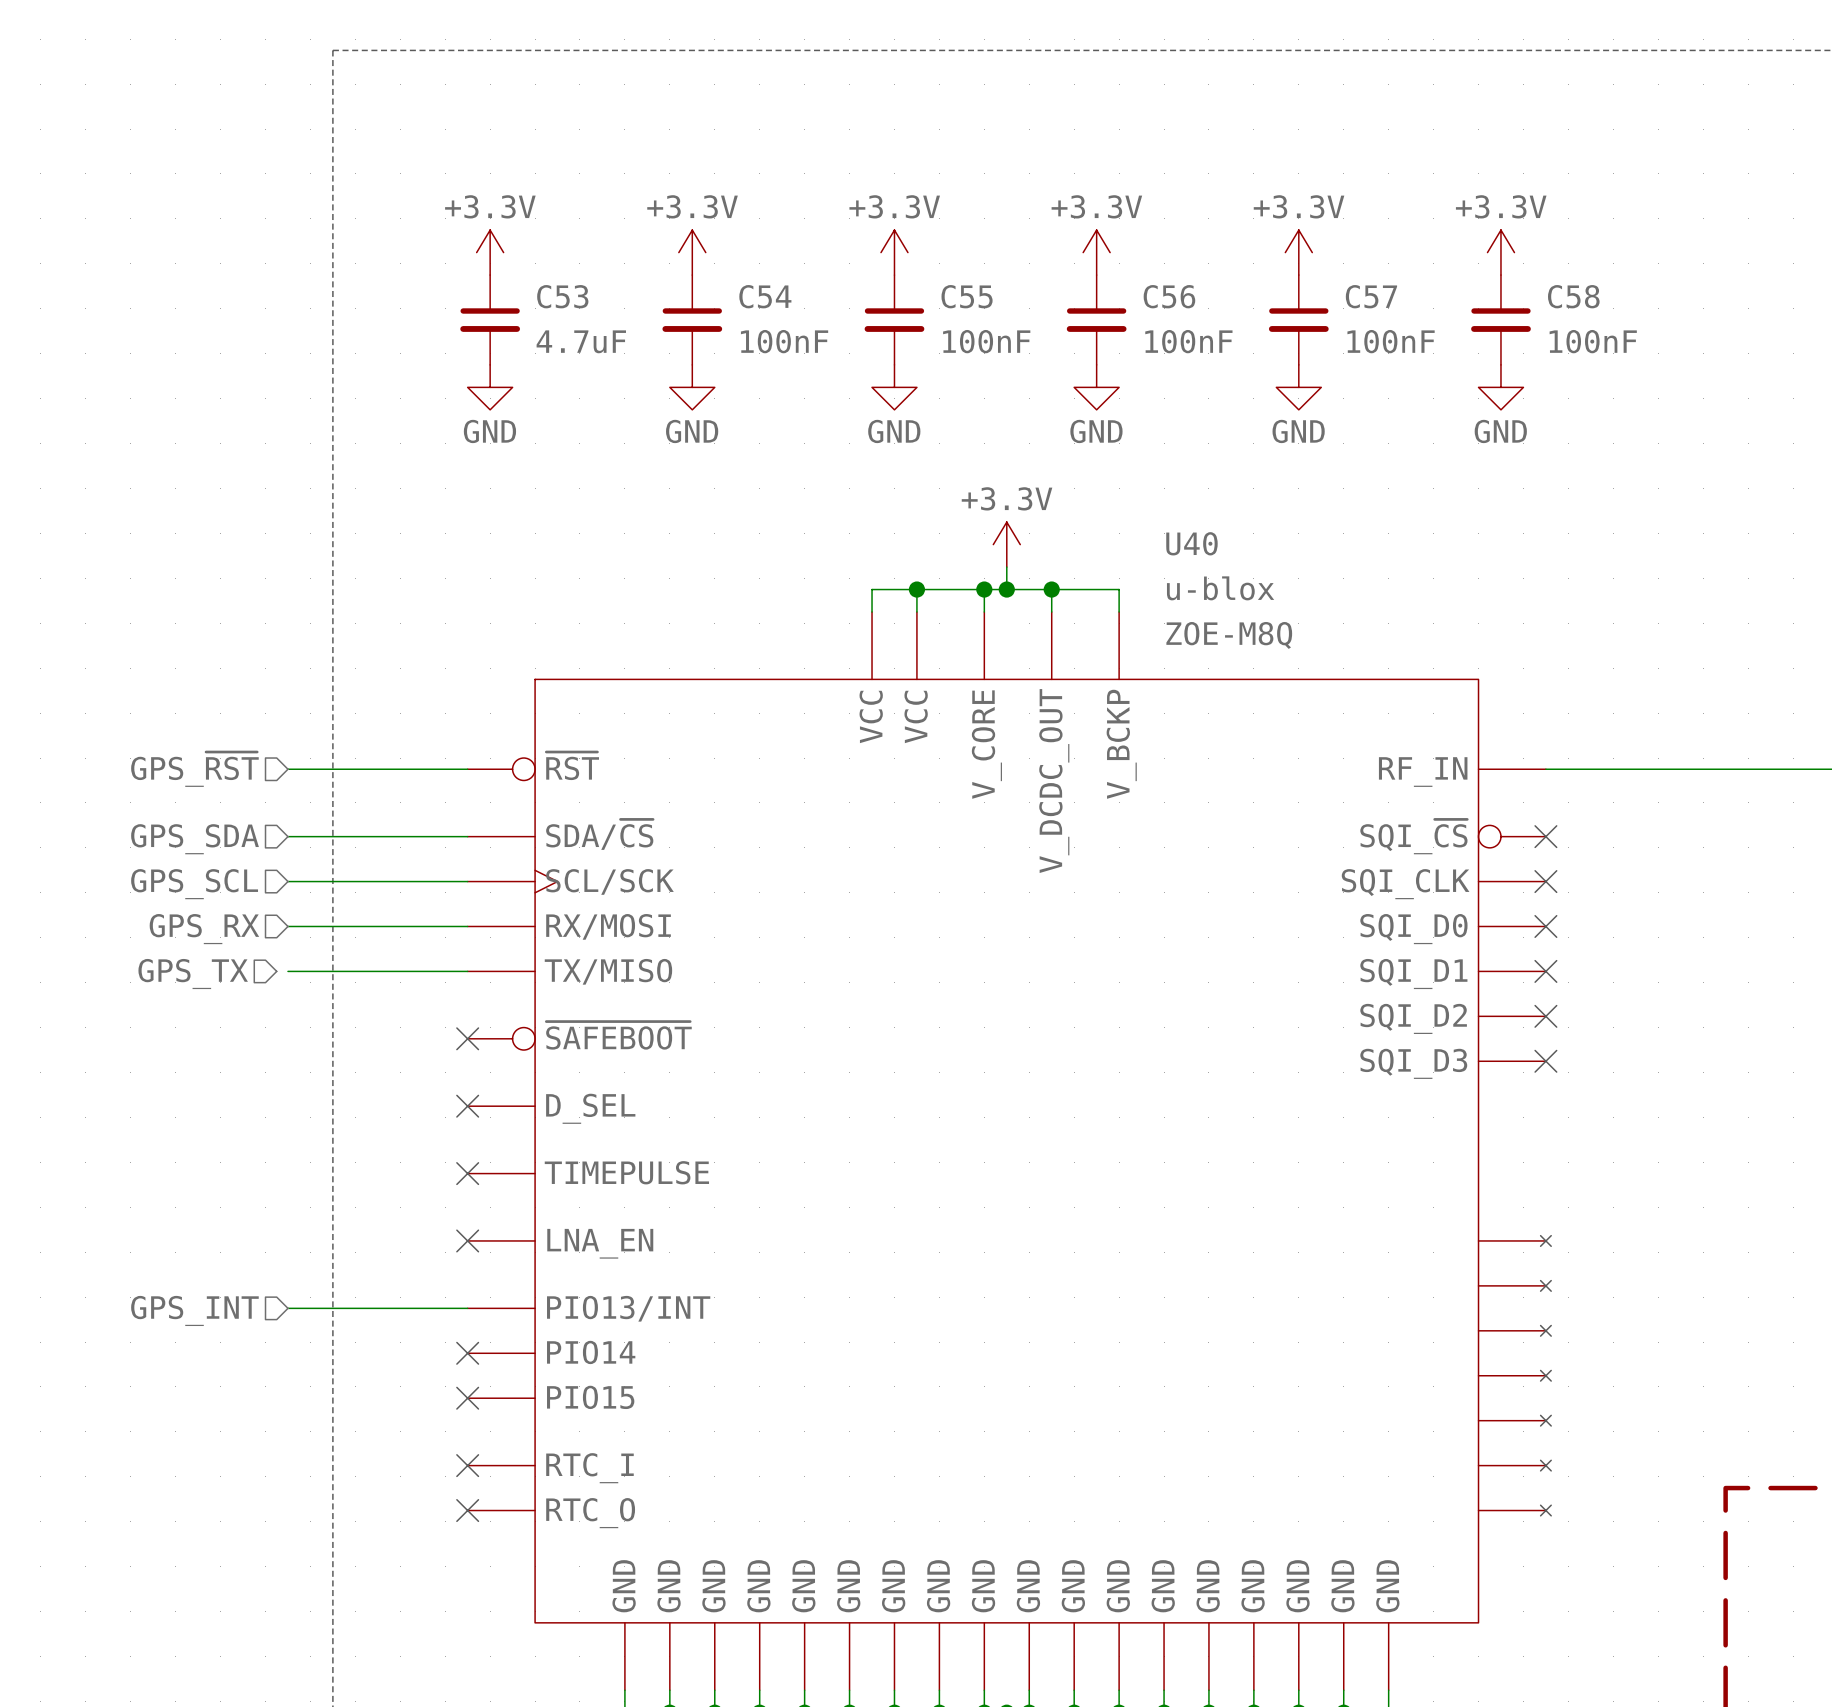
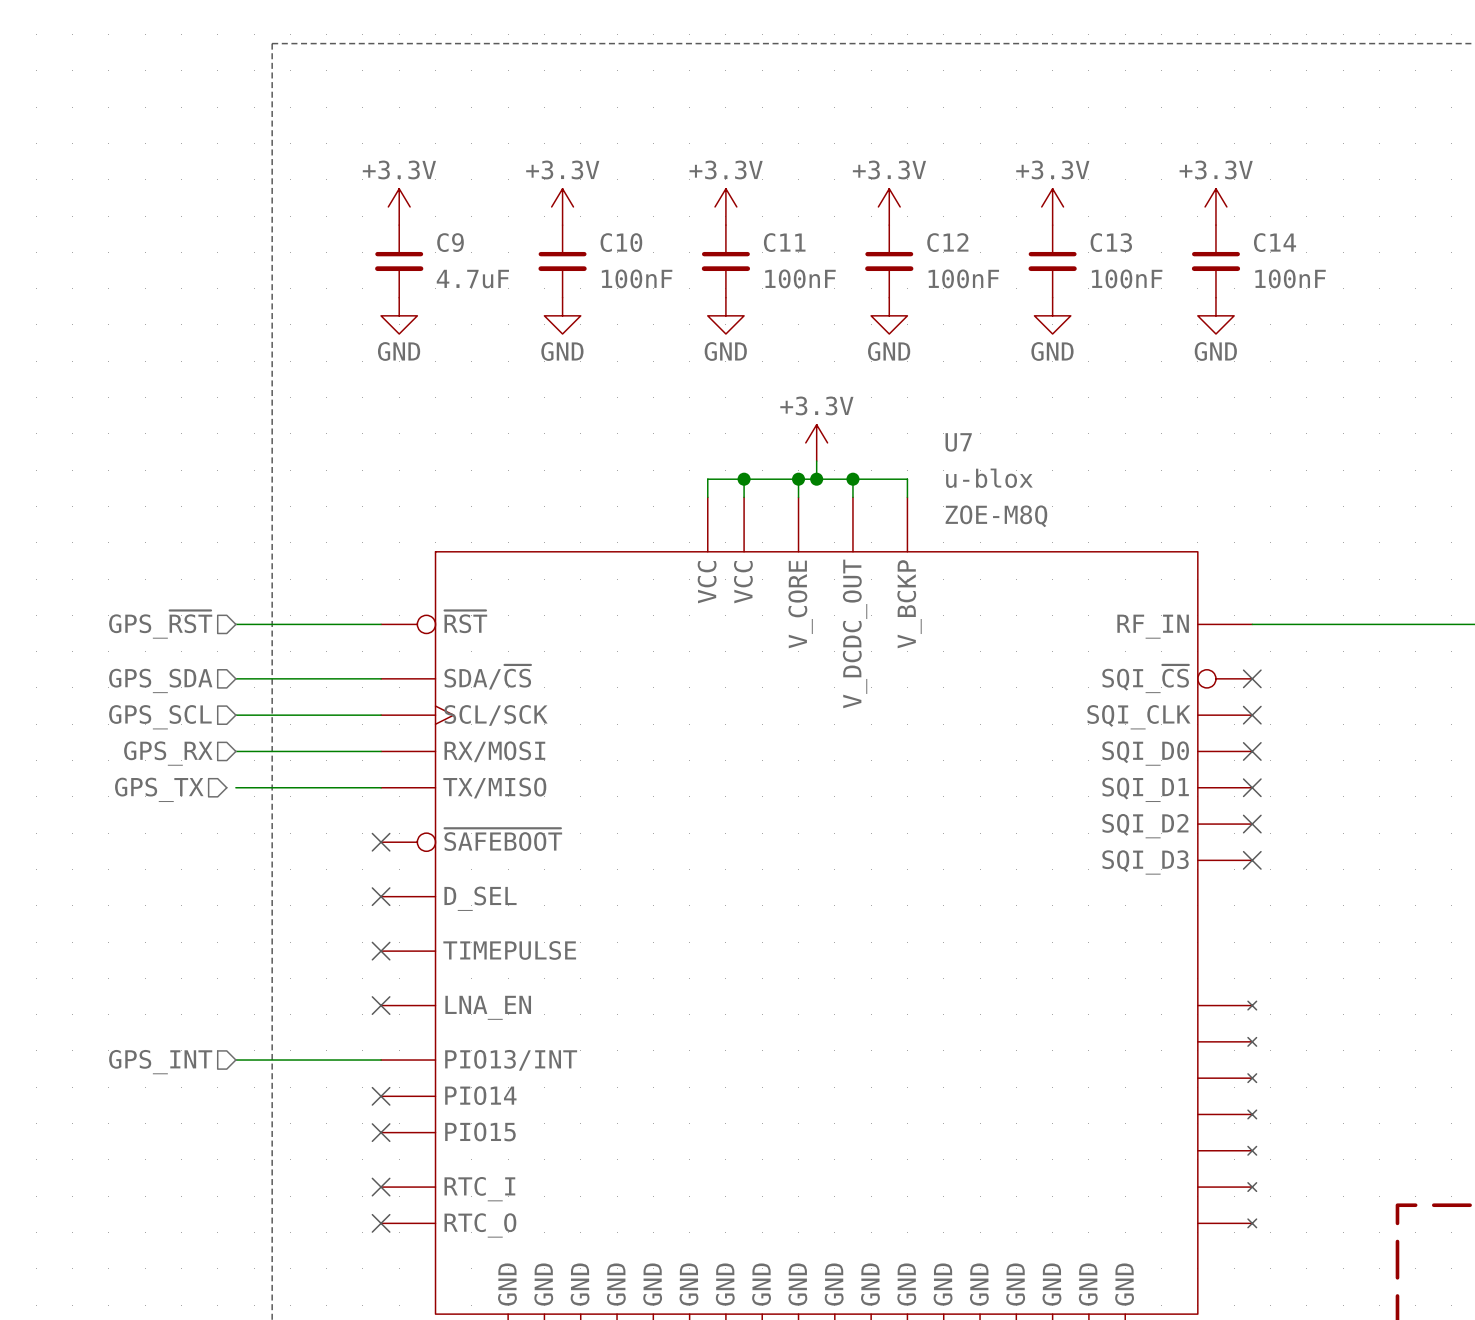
C53 name: C53 (562, 296) -> C9 (450, 242)
C54 name: C54 (765, 296) -> C10 (621, 242)
C55 name: C55 (967, 296) -> C11 (784, 242)
C56 name: C56 (1169, 296) -> C12 (947, 242)
C57 name: C57 (1371, 296) -> C13 (1111, 242)
C58 name: C58 (1573, 296) -> C14 (1275, 242)
U40 name: U40 (1191, 543) -> U7 (958, 442)

